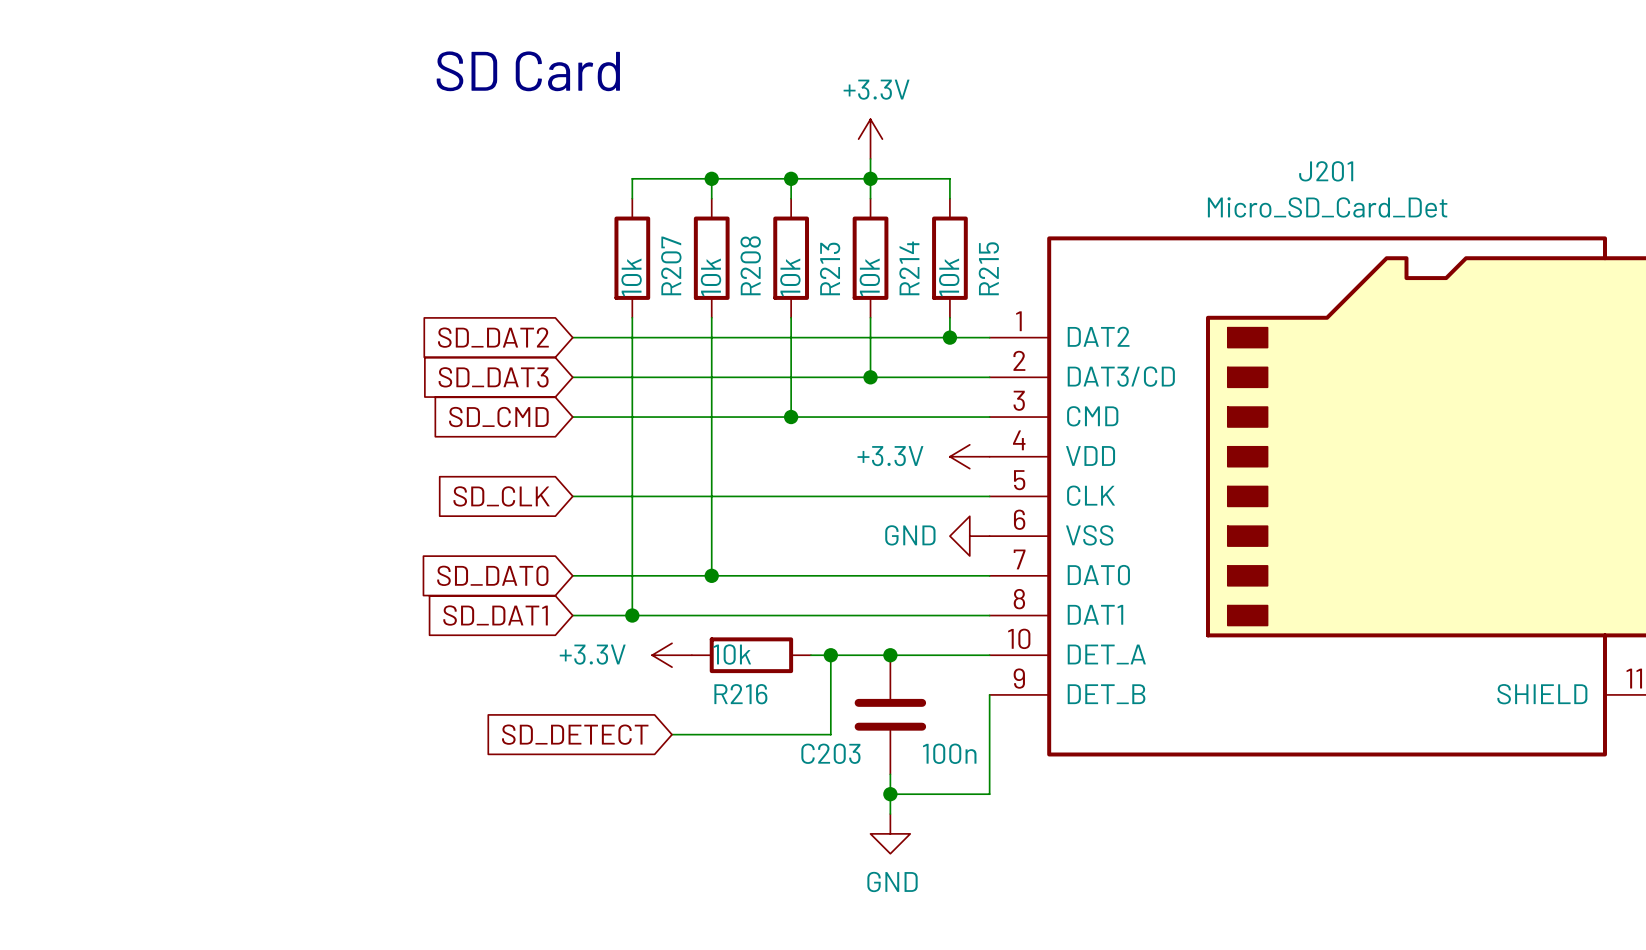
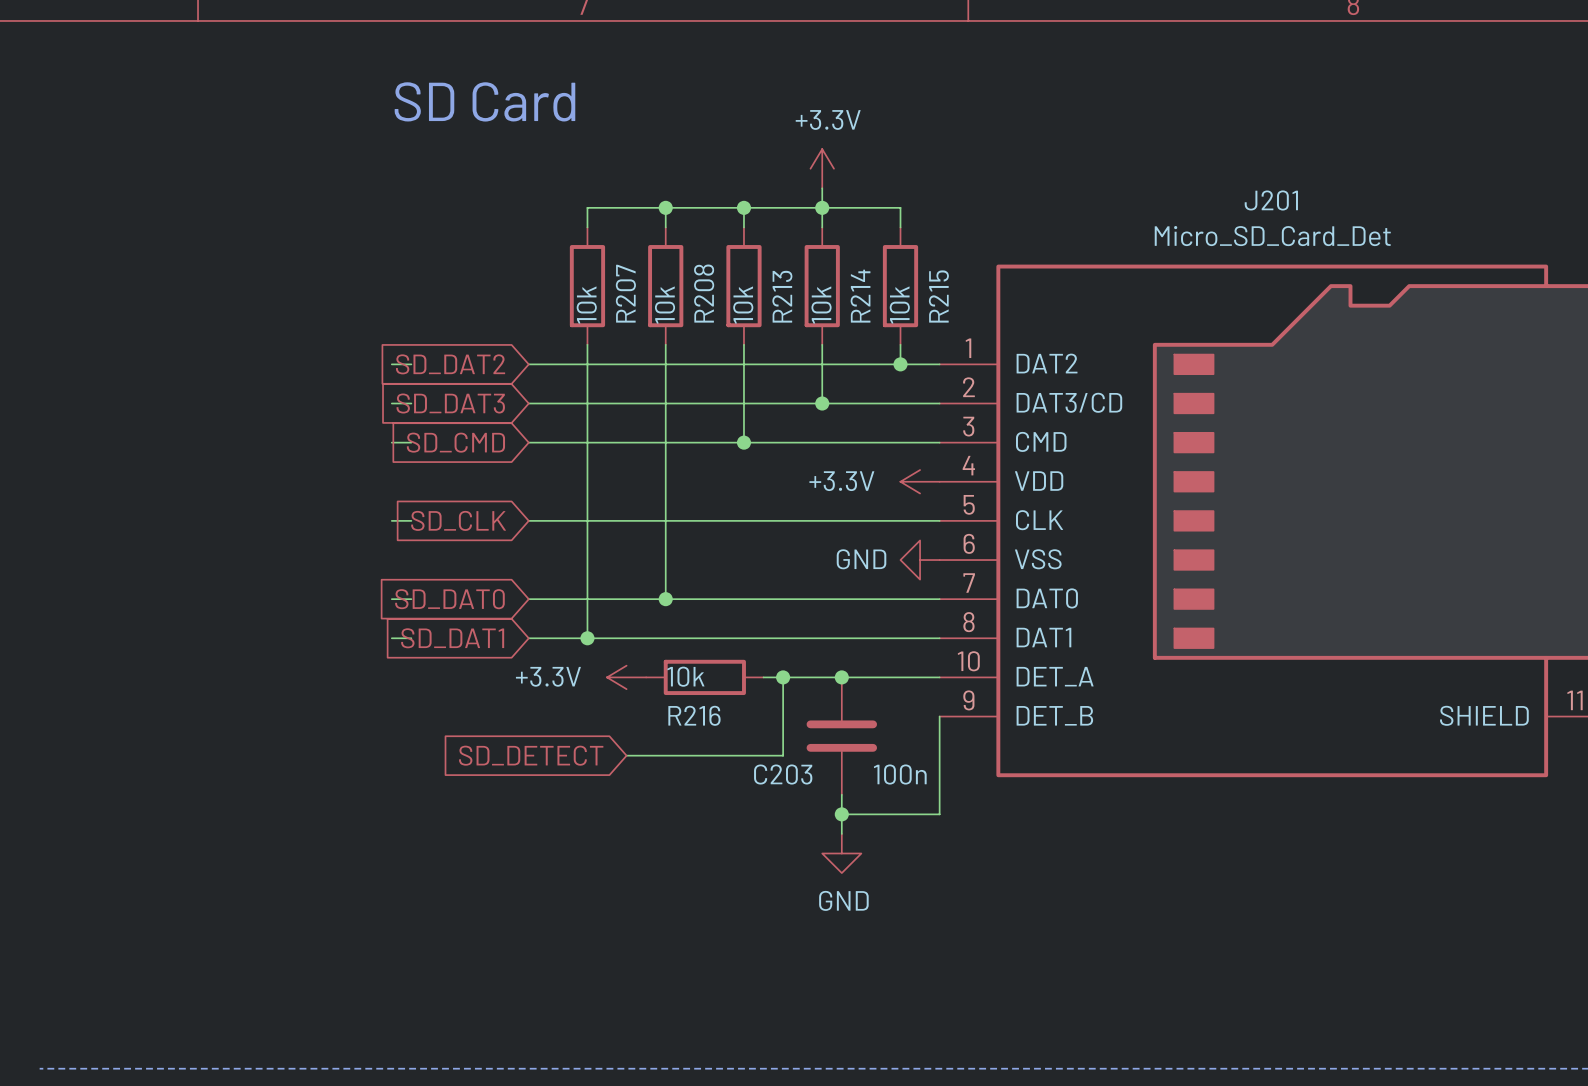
wire: none -> (391, 364) (411, 364)
wire: none -> (391, 403) (411, 403)
wire: none -> (391, 442) (411, 442)
wire: none -> (391, 520) (411, 520)
wire: none -> (391, 599) (411, 599)
wire: none -> (391, 638) (411, 638)

